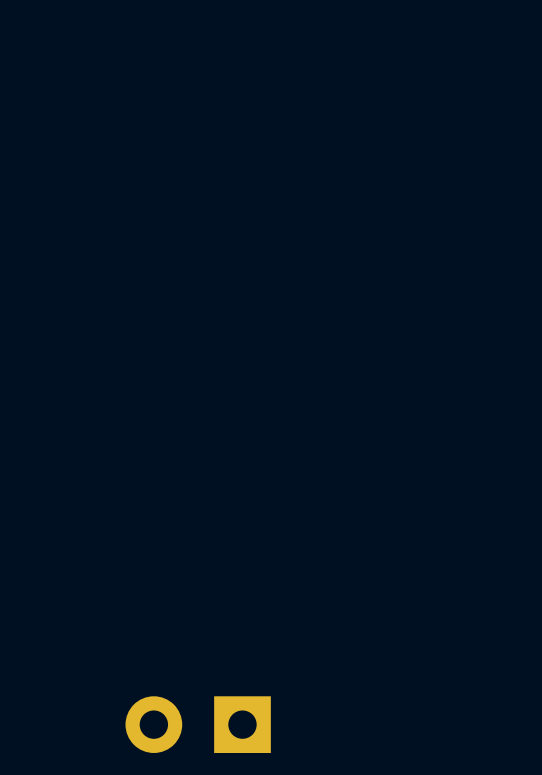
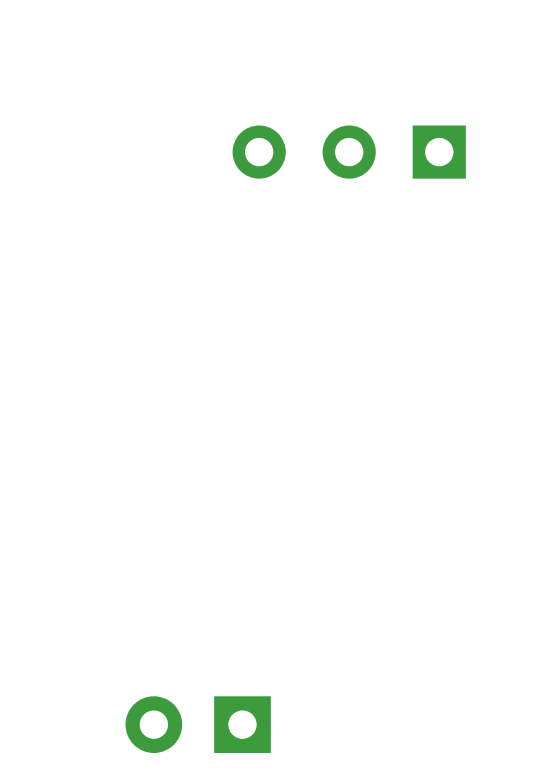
part: none -> (349, 152)

